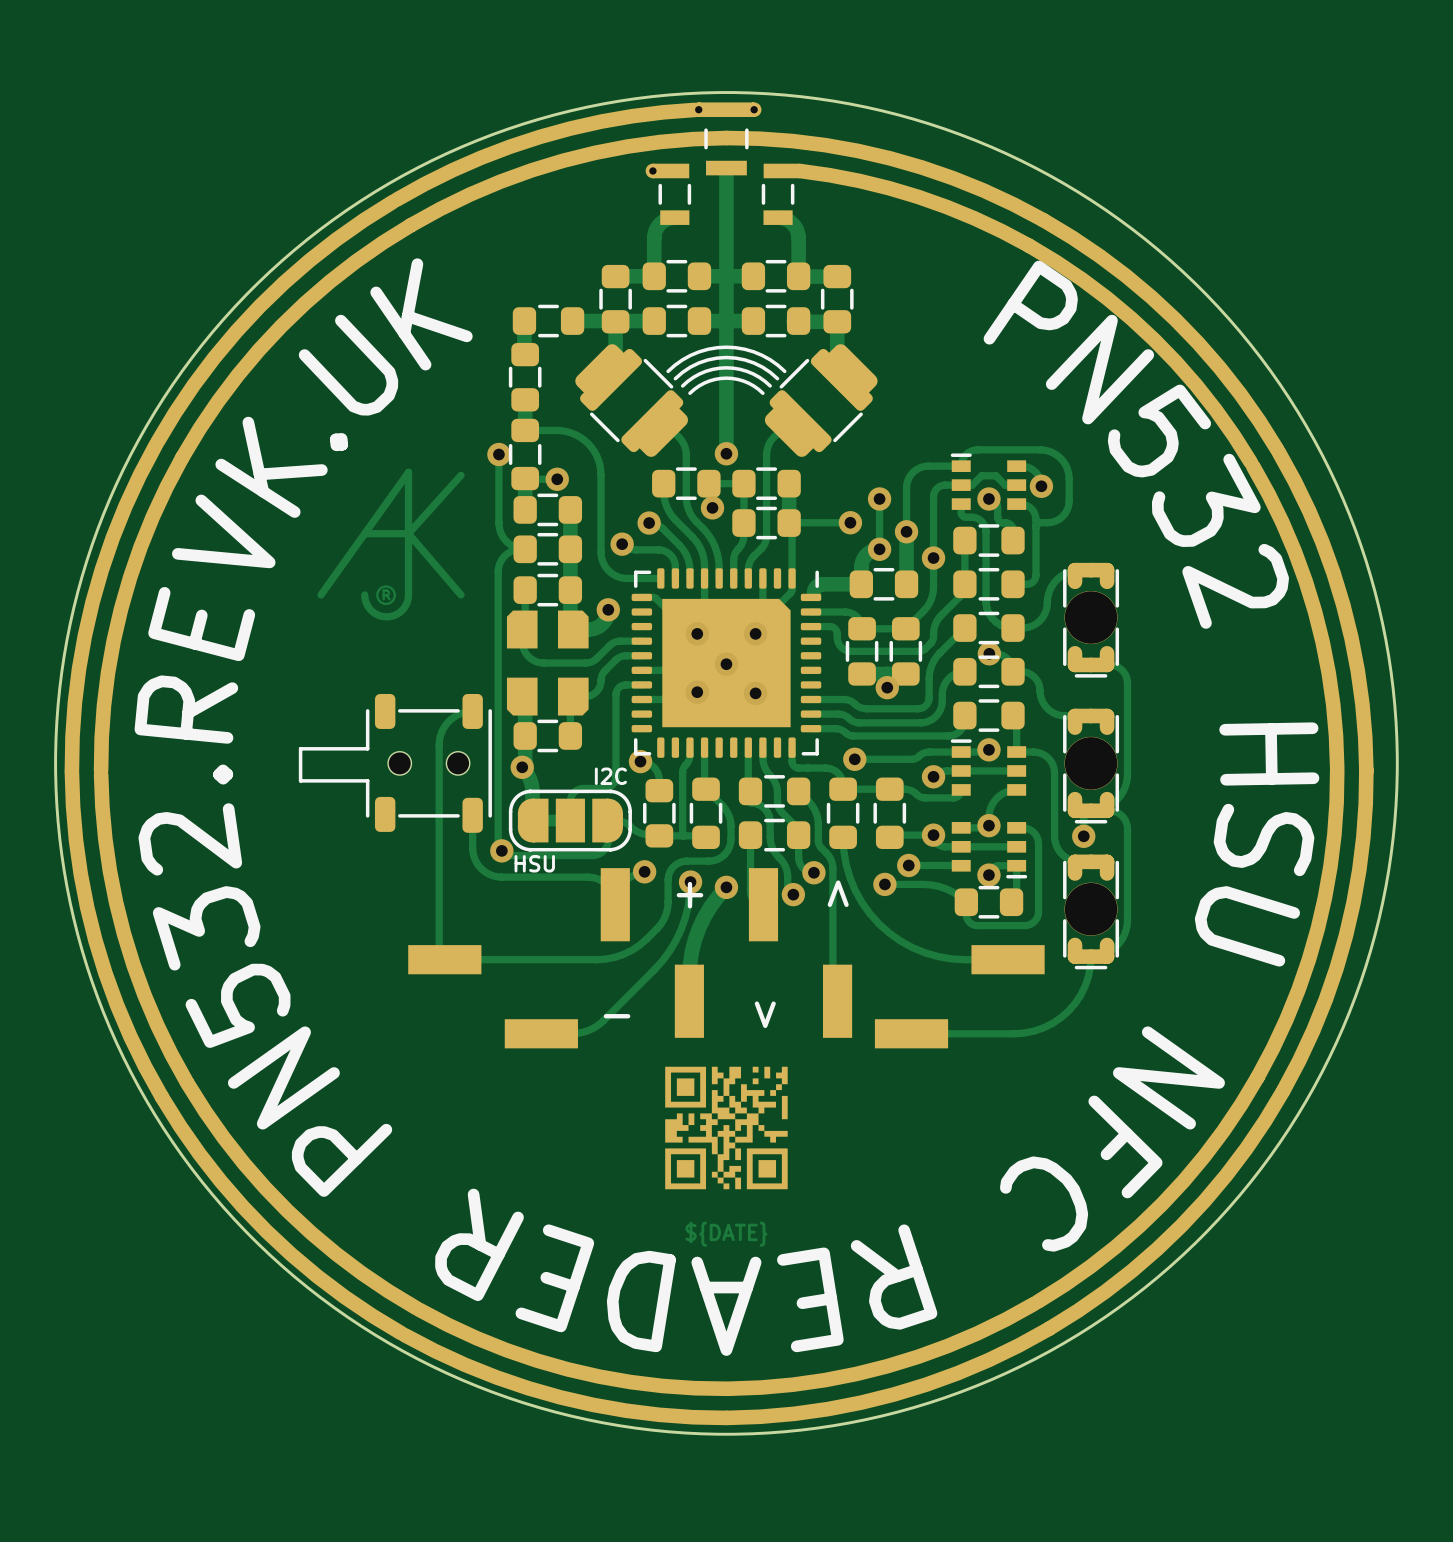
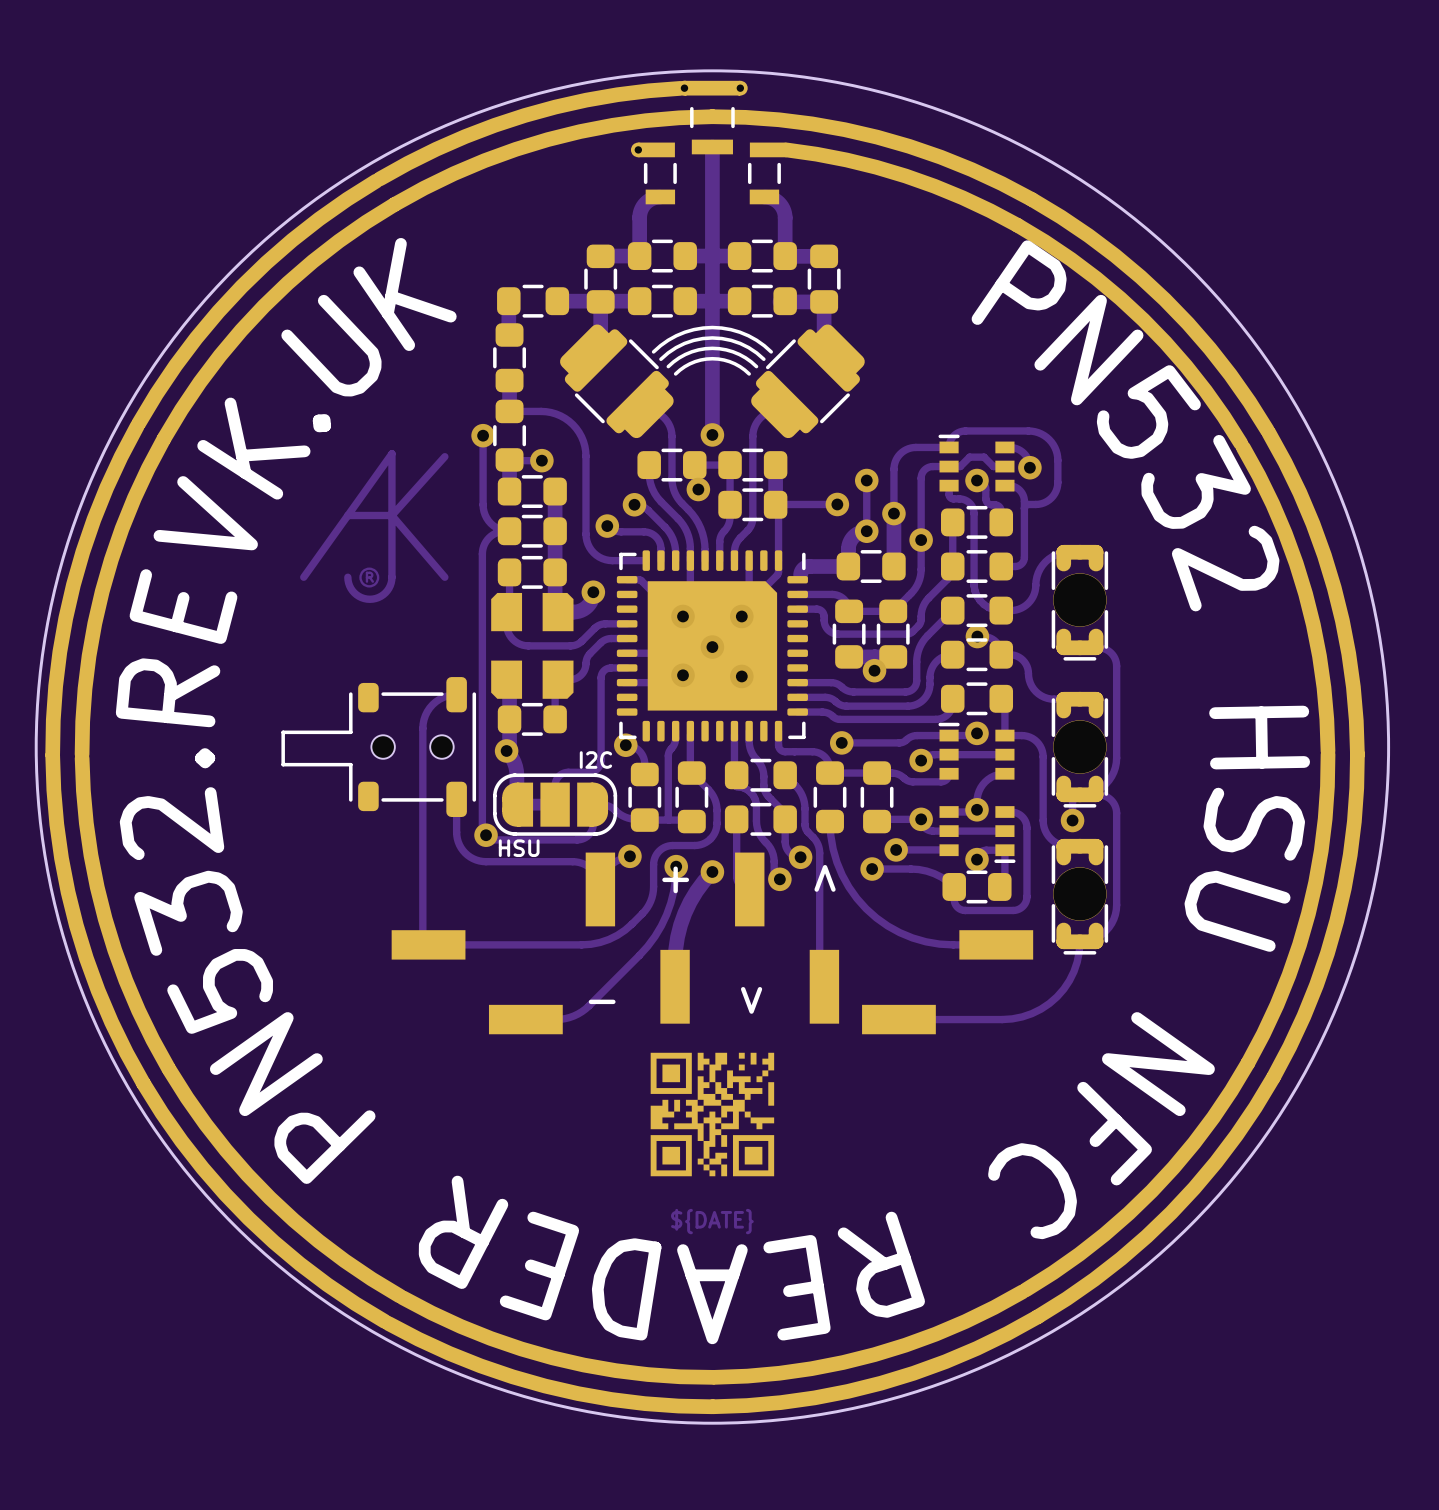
part footprint: [298, 693, 492, 833] -> [281, 677, 477, 817]

